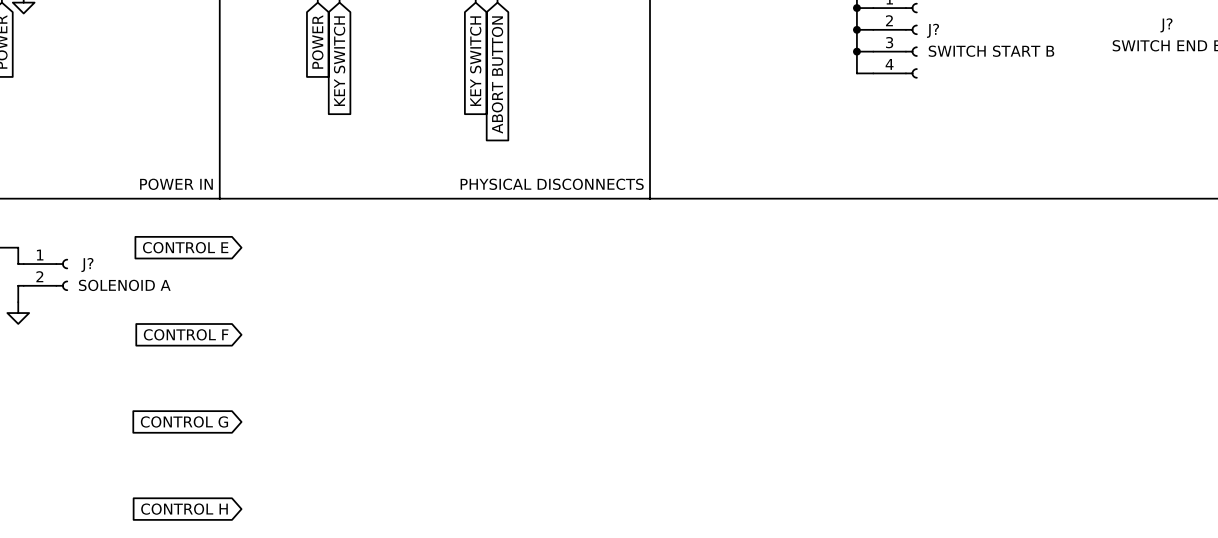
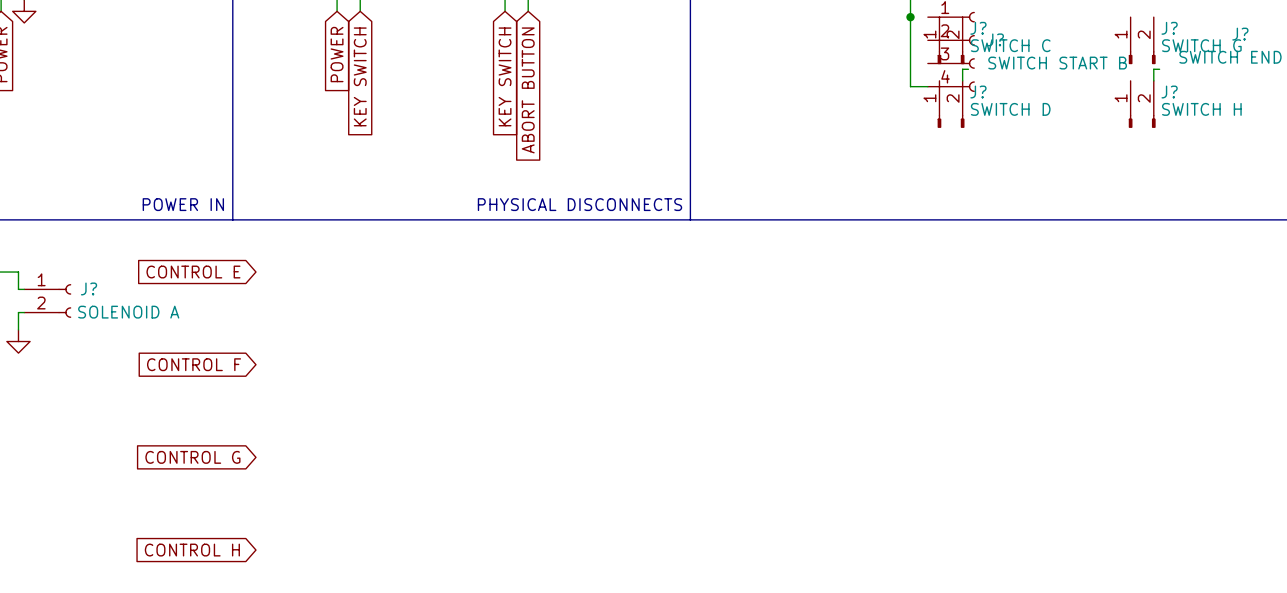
wire: (856, 8) (873, 8) -> none
wire: (856, 29) (873, 29) -> none
junction: (856, 29) -> none
J?: none -> SWITCH C (951, 40)
J?: none -> SWITCH G (1142, 40)
wire: (856, 51) (873, 51) -> none
junction: (856, 51) -> none
wire: none -> (968, 69) (962, 69) (962, 80)
wire: none -> (1159, 69) (1153, 69) (1153, 80)
J?: none -> SWITCH D (951, 104)
J?: none -> SWITCH H (1142, 104)

